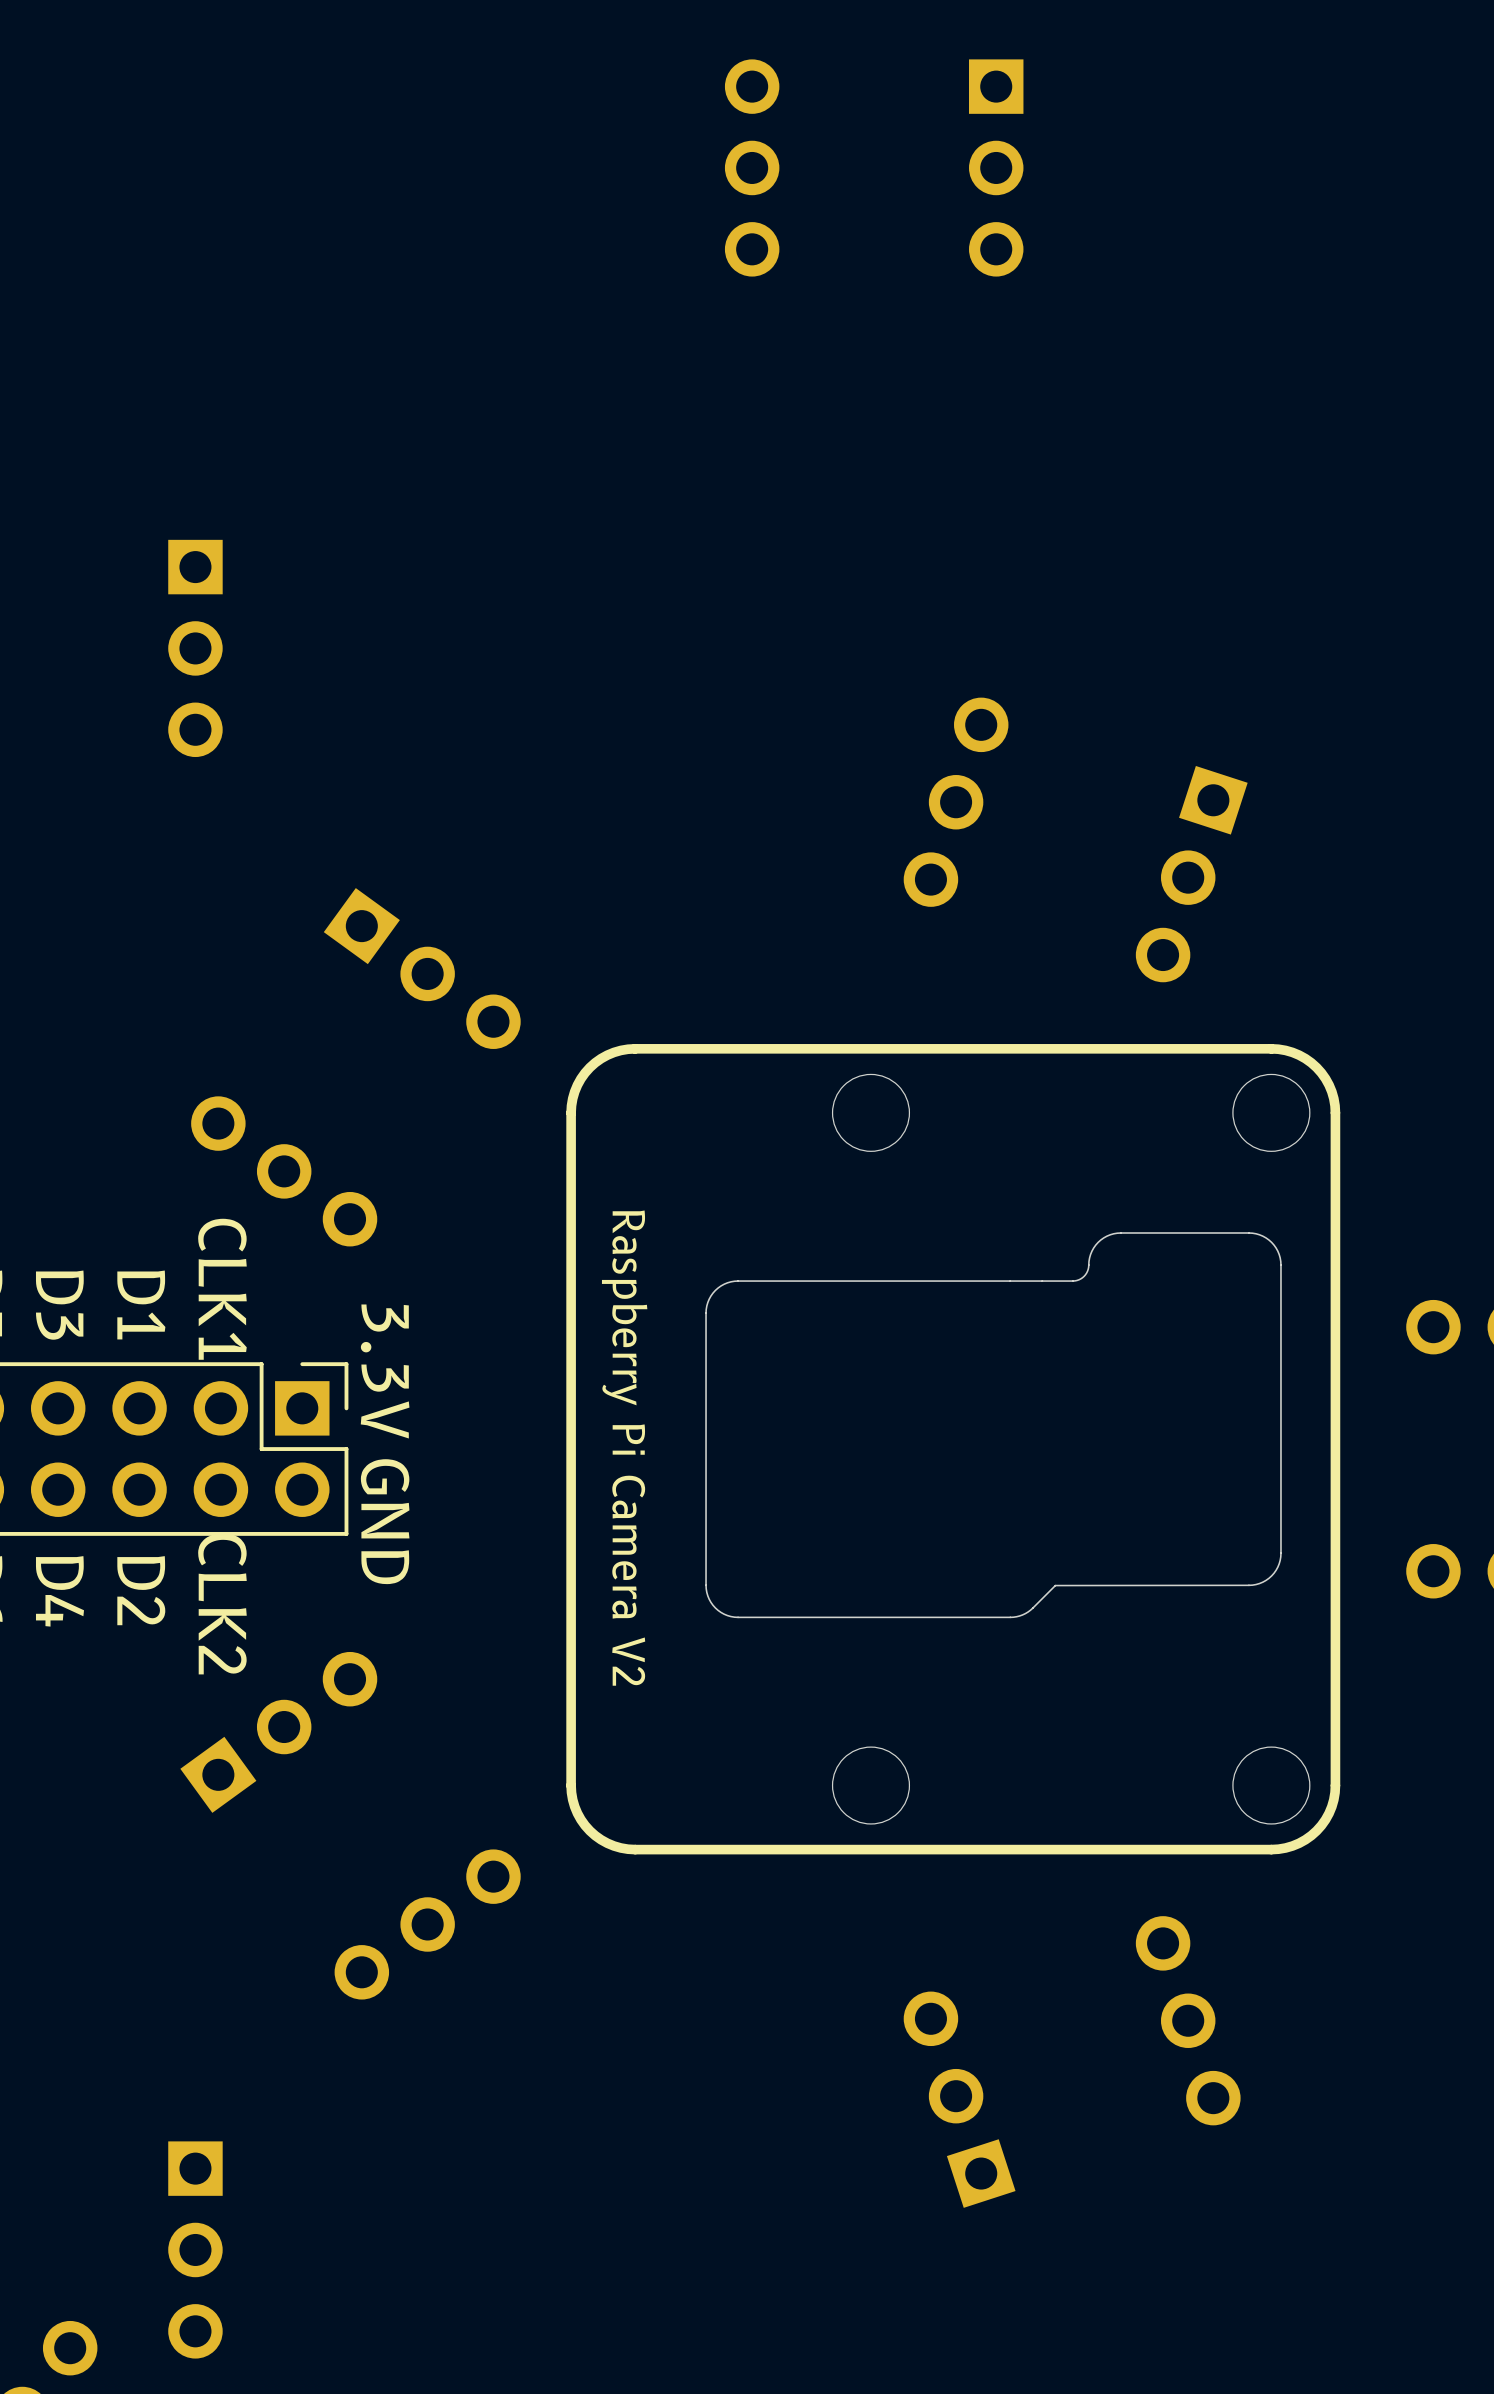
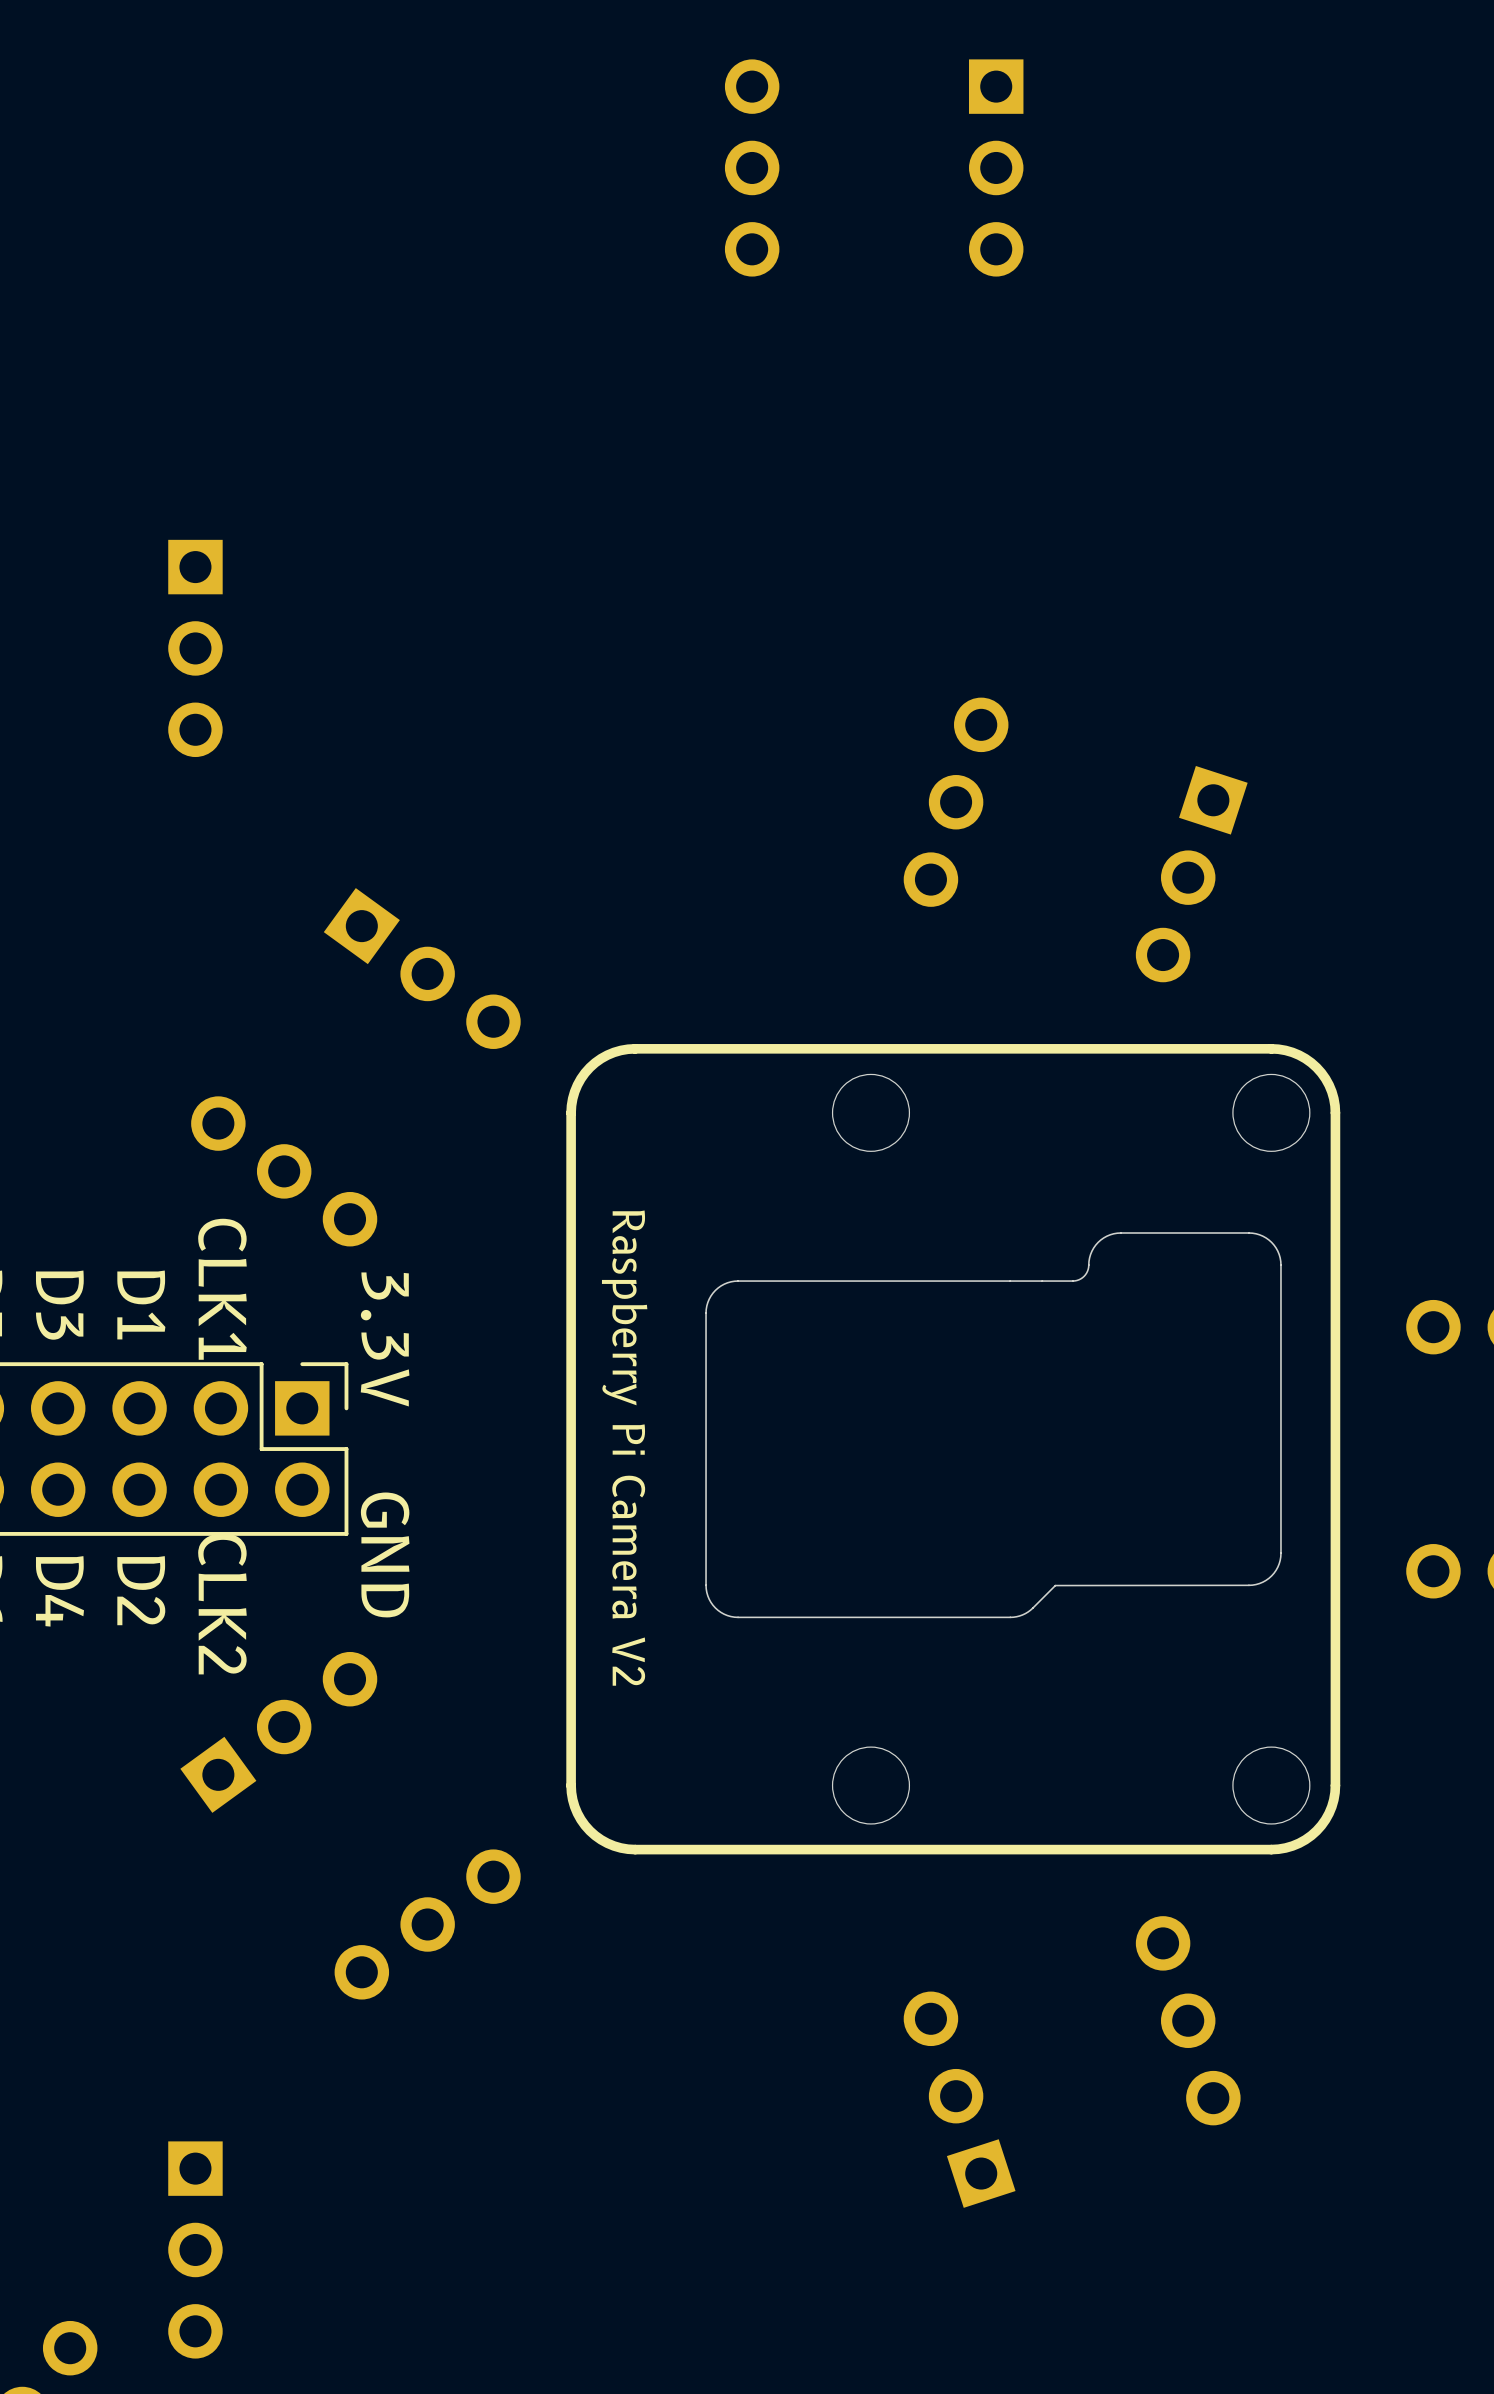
part text position: 3.3V (385, 1371) -> 3.3V (385, 1339)
part text position: GND (385, 1521) -> GND (385, 1554)

